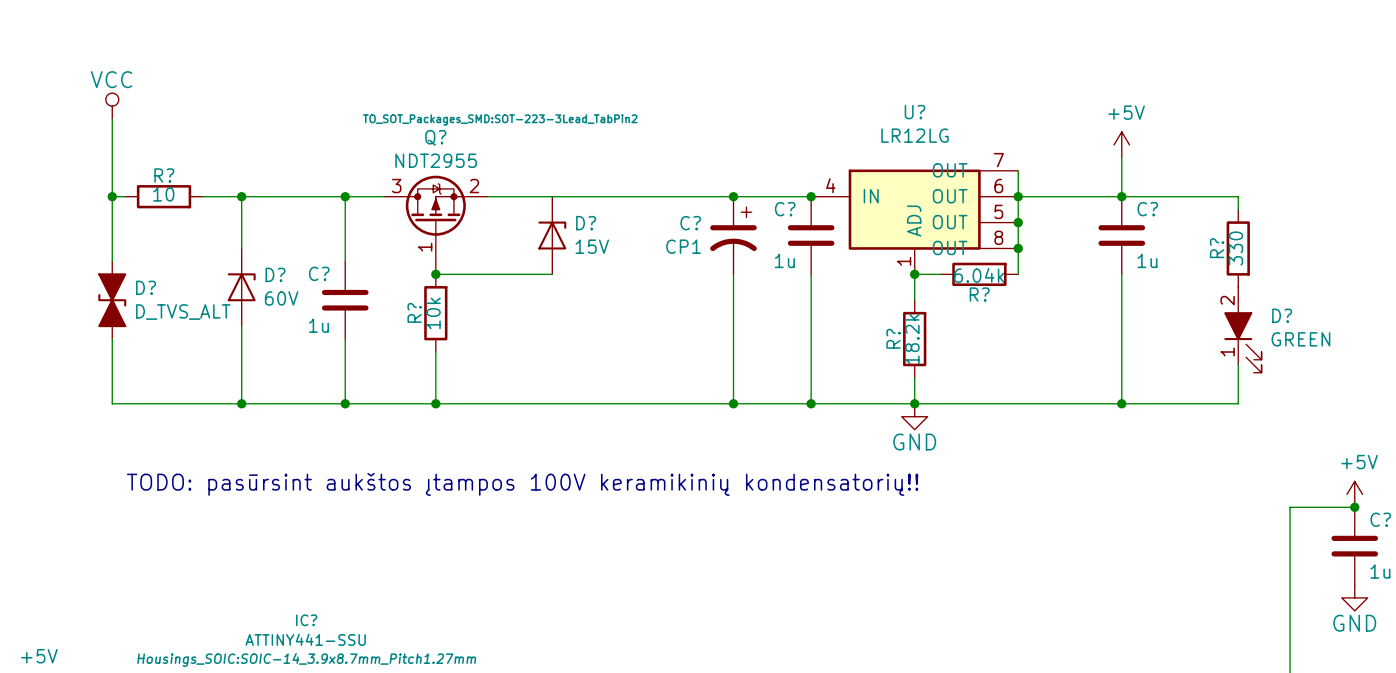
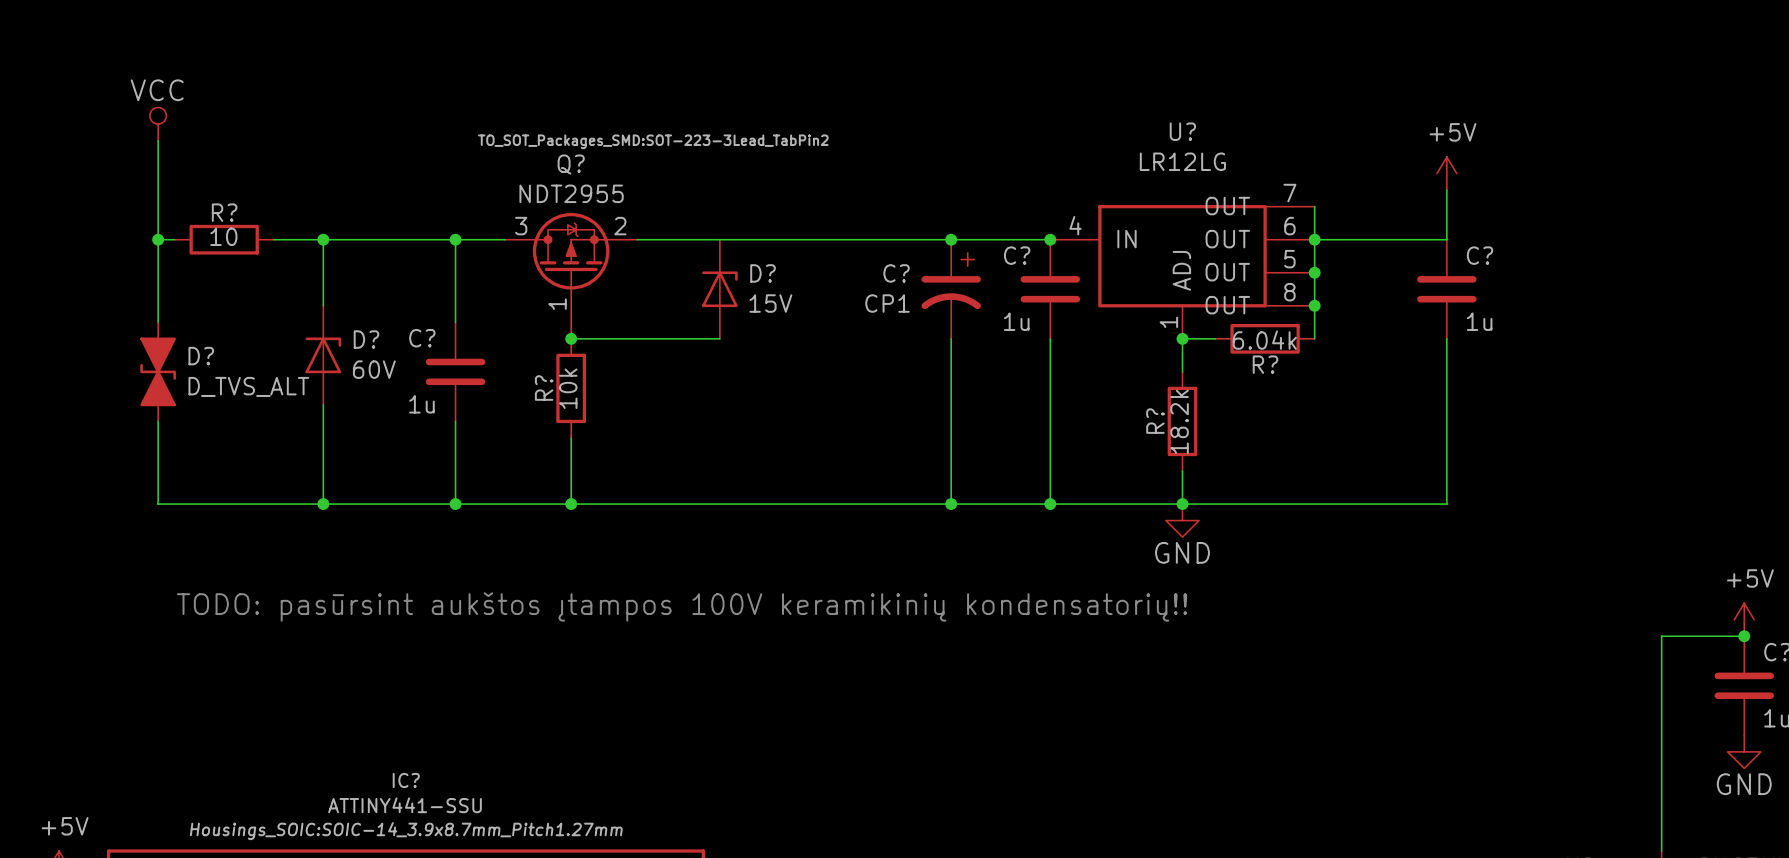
wire: (1121, 196) (1238, 196) (1238, 209) -> none
junction: (1121, 196) -> none
R?: 330 (1238, 248) -> none
D?: GREEN (1242, 330) -> none
wire: (1238, 364) (1238, 403) (1121, 403) -> none
junction: (1121, 403) -> none

